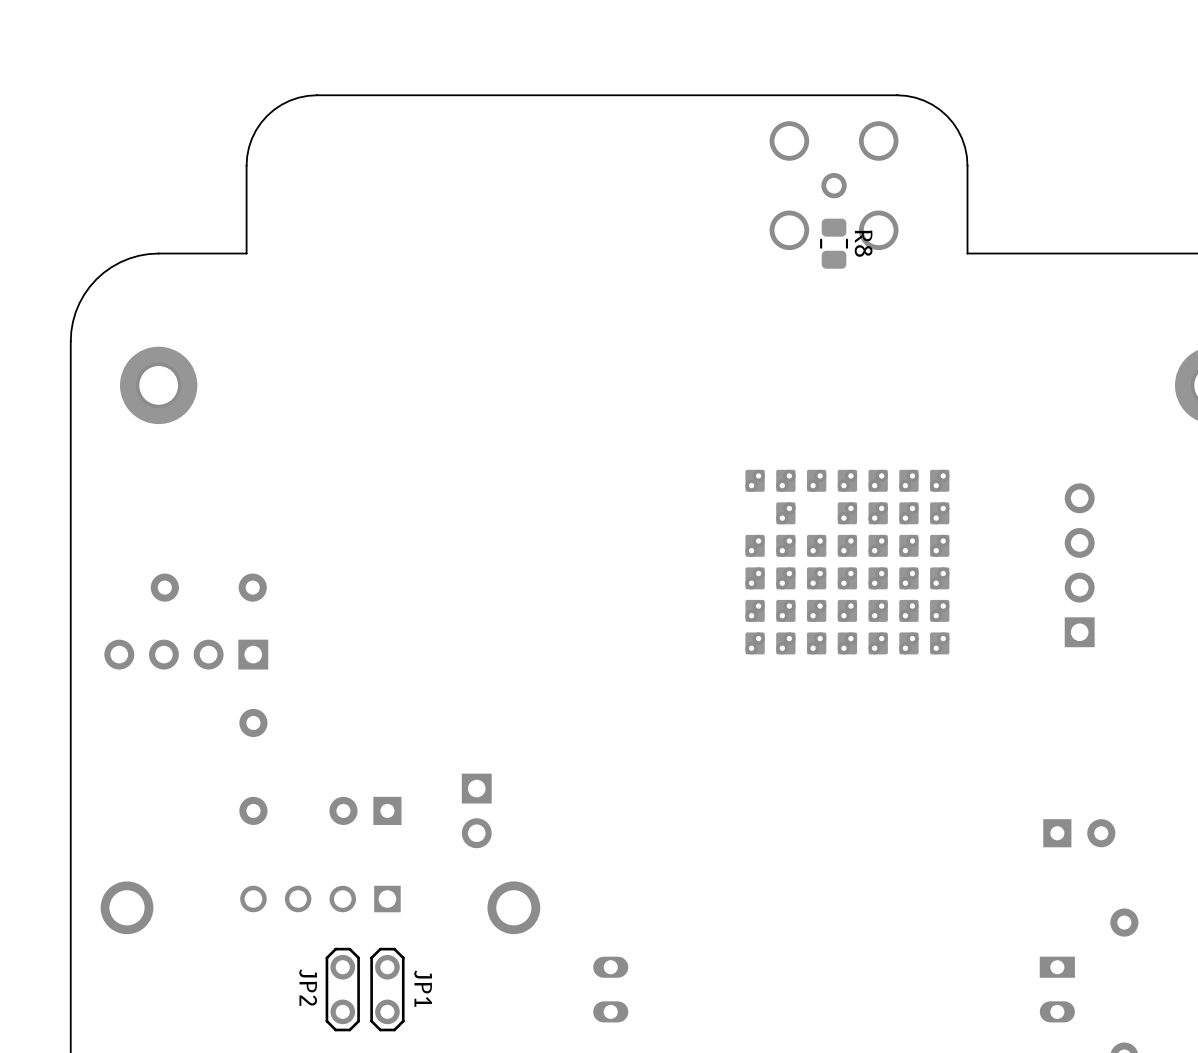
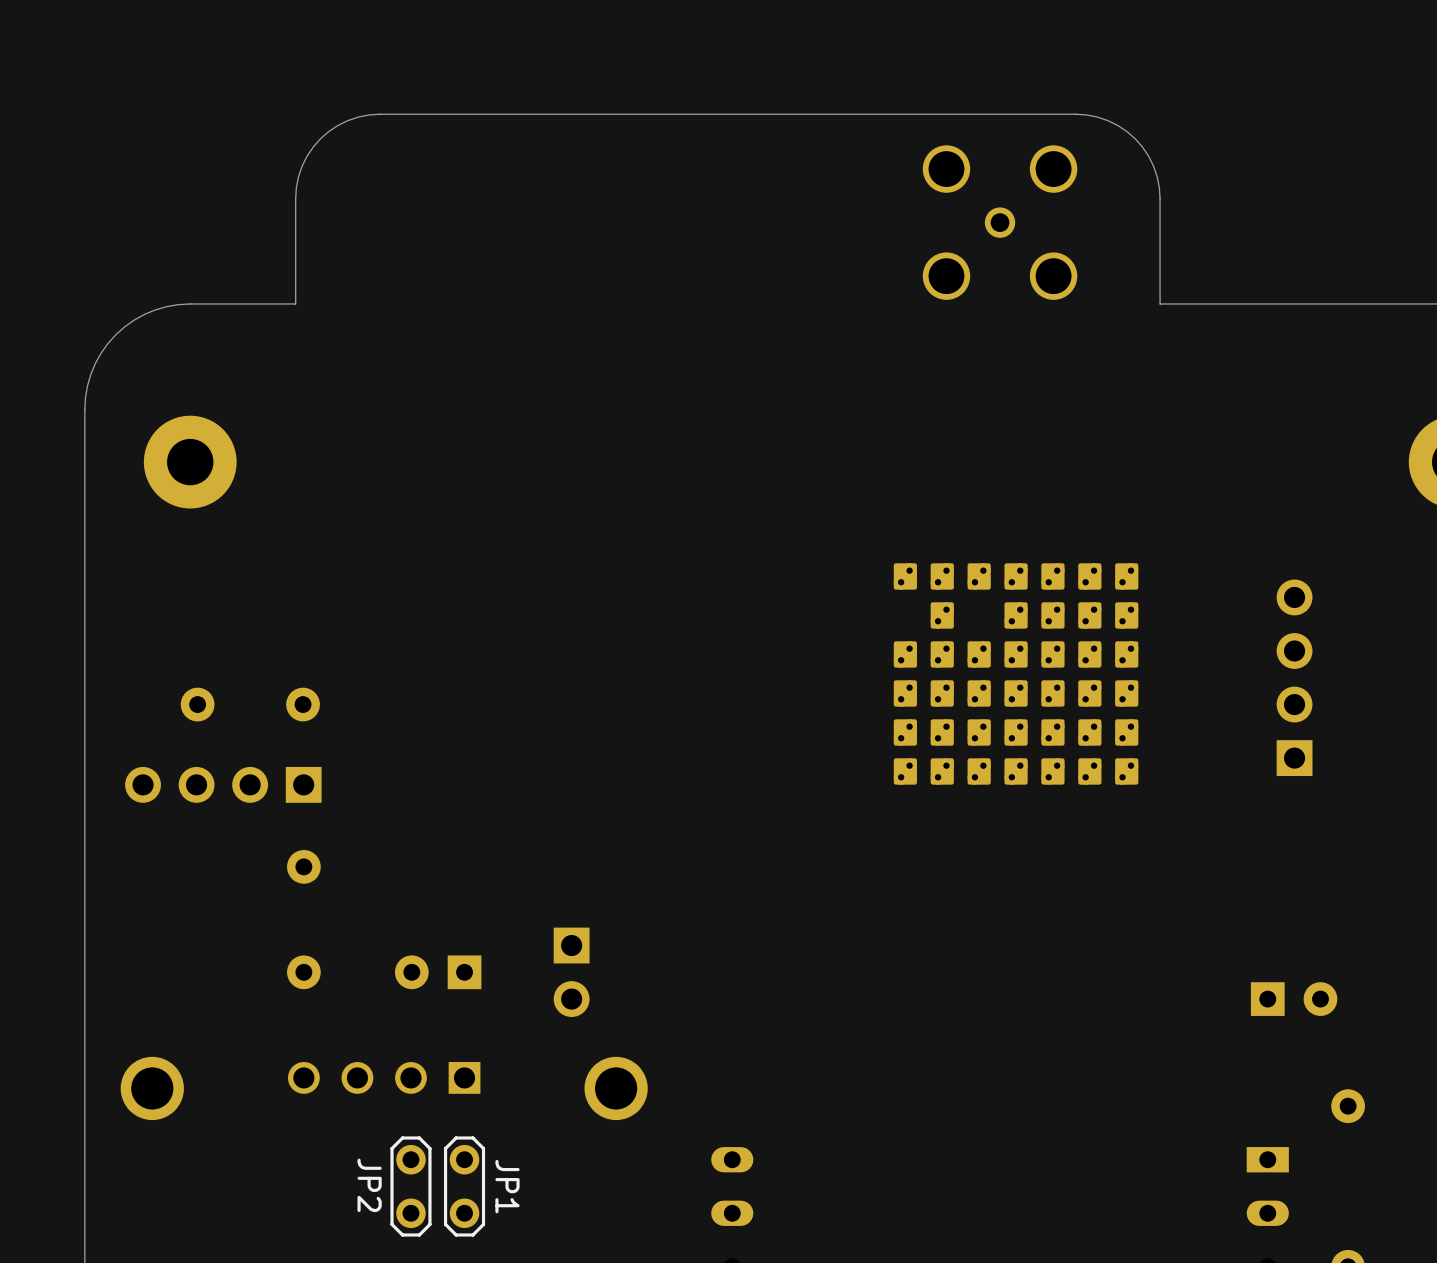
R8: (834, 243) -> none

